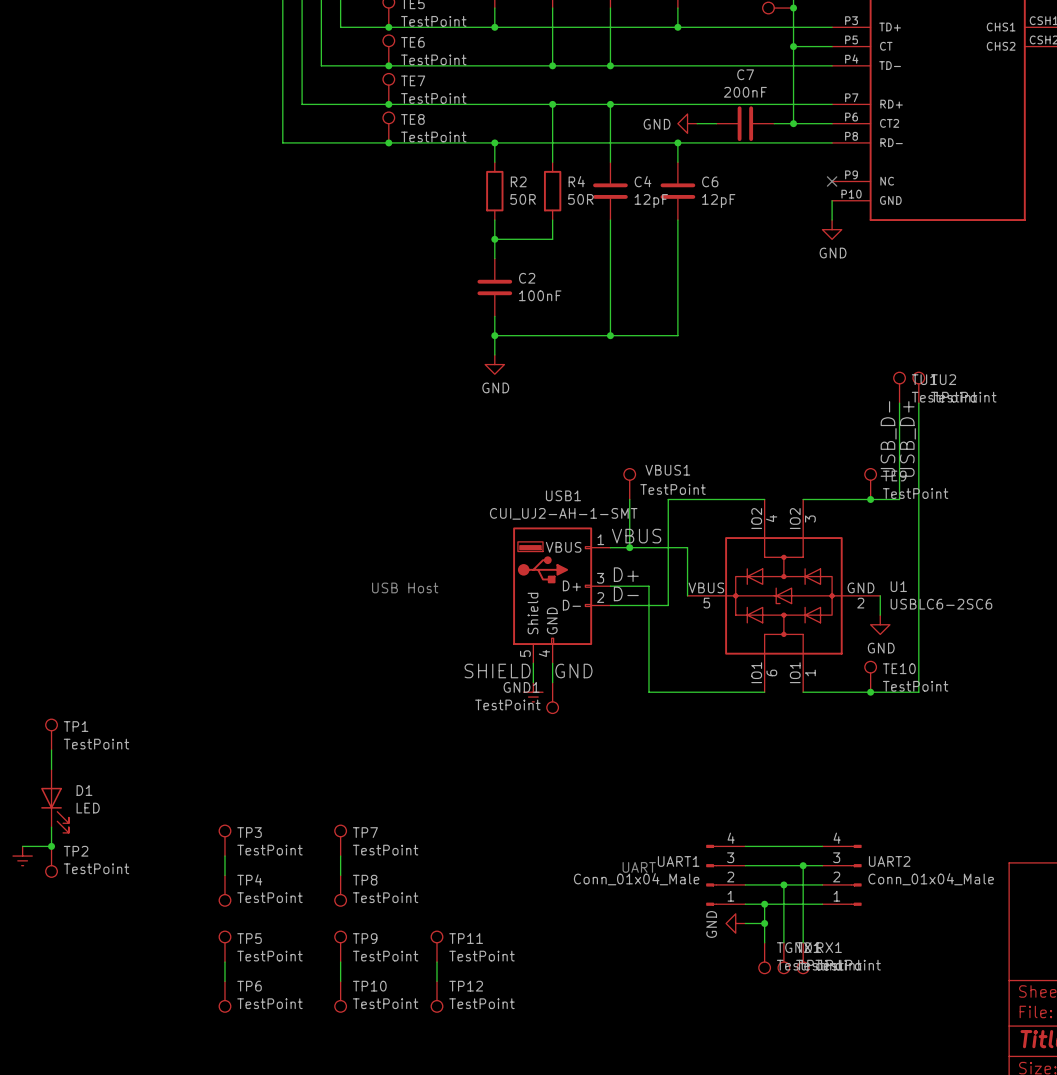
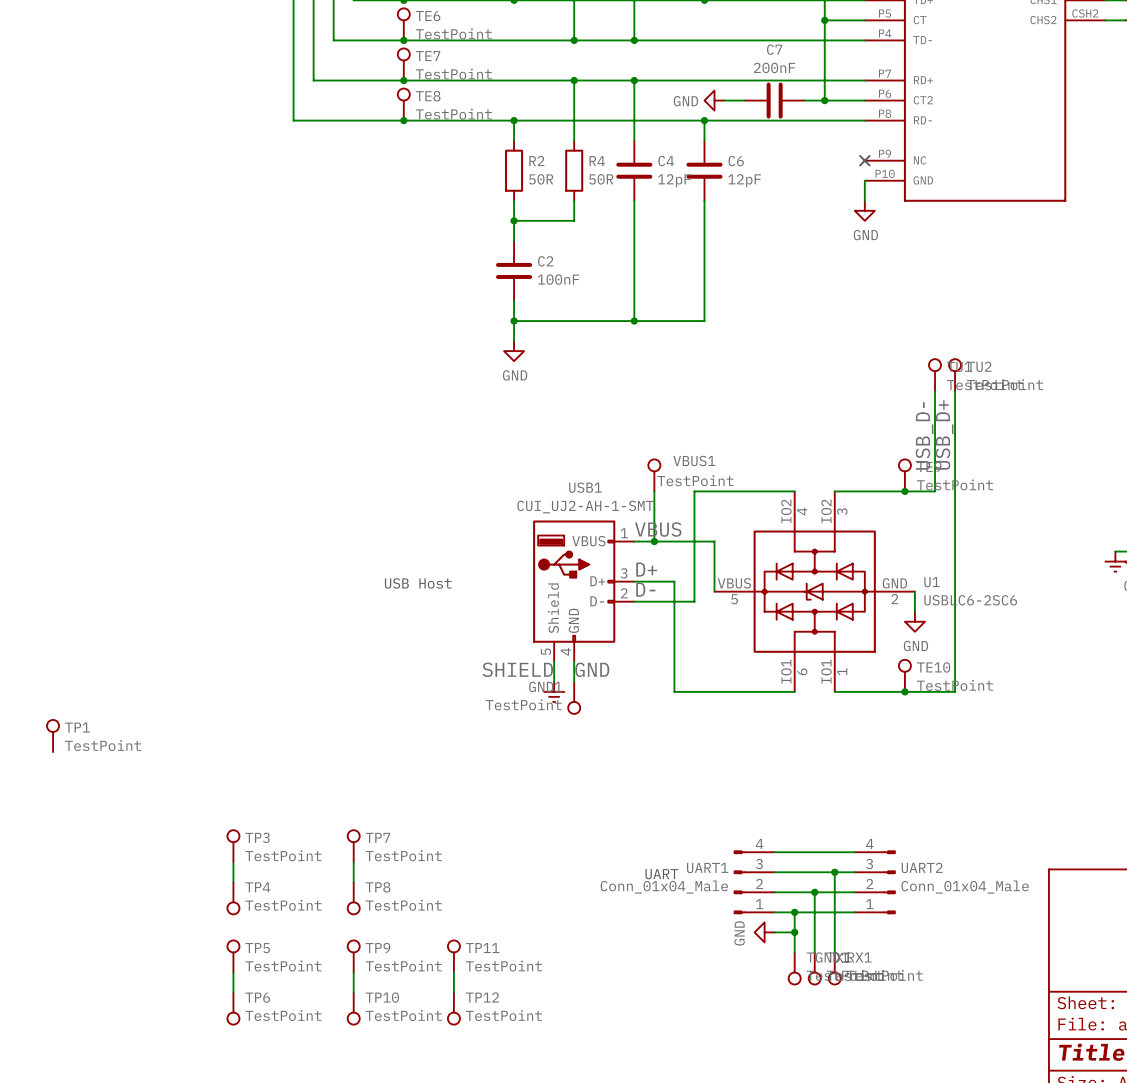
wire: (51, 750) (51, 769) -> none
D1: LED (55, 801) -> none
wire: (51, 827) (51, 846) (22, 846) -> none
junction: (51, 846) -> none
power symbol: (22, 856) -> none
TP2: TestPoint (51, 861) -> none

